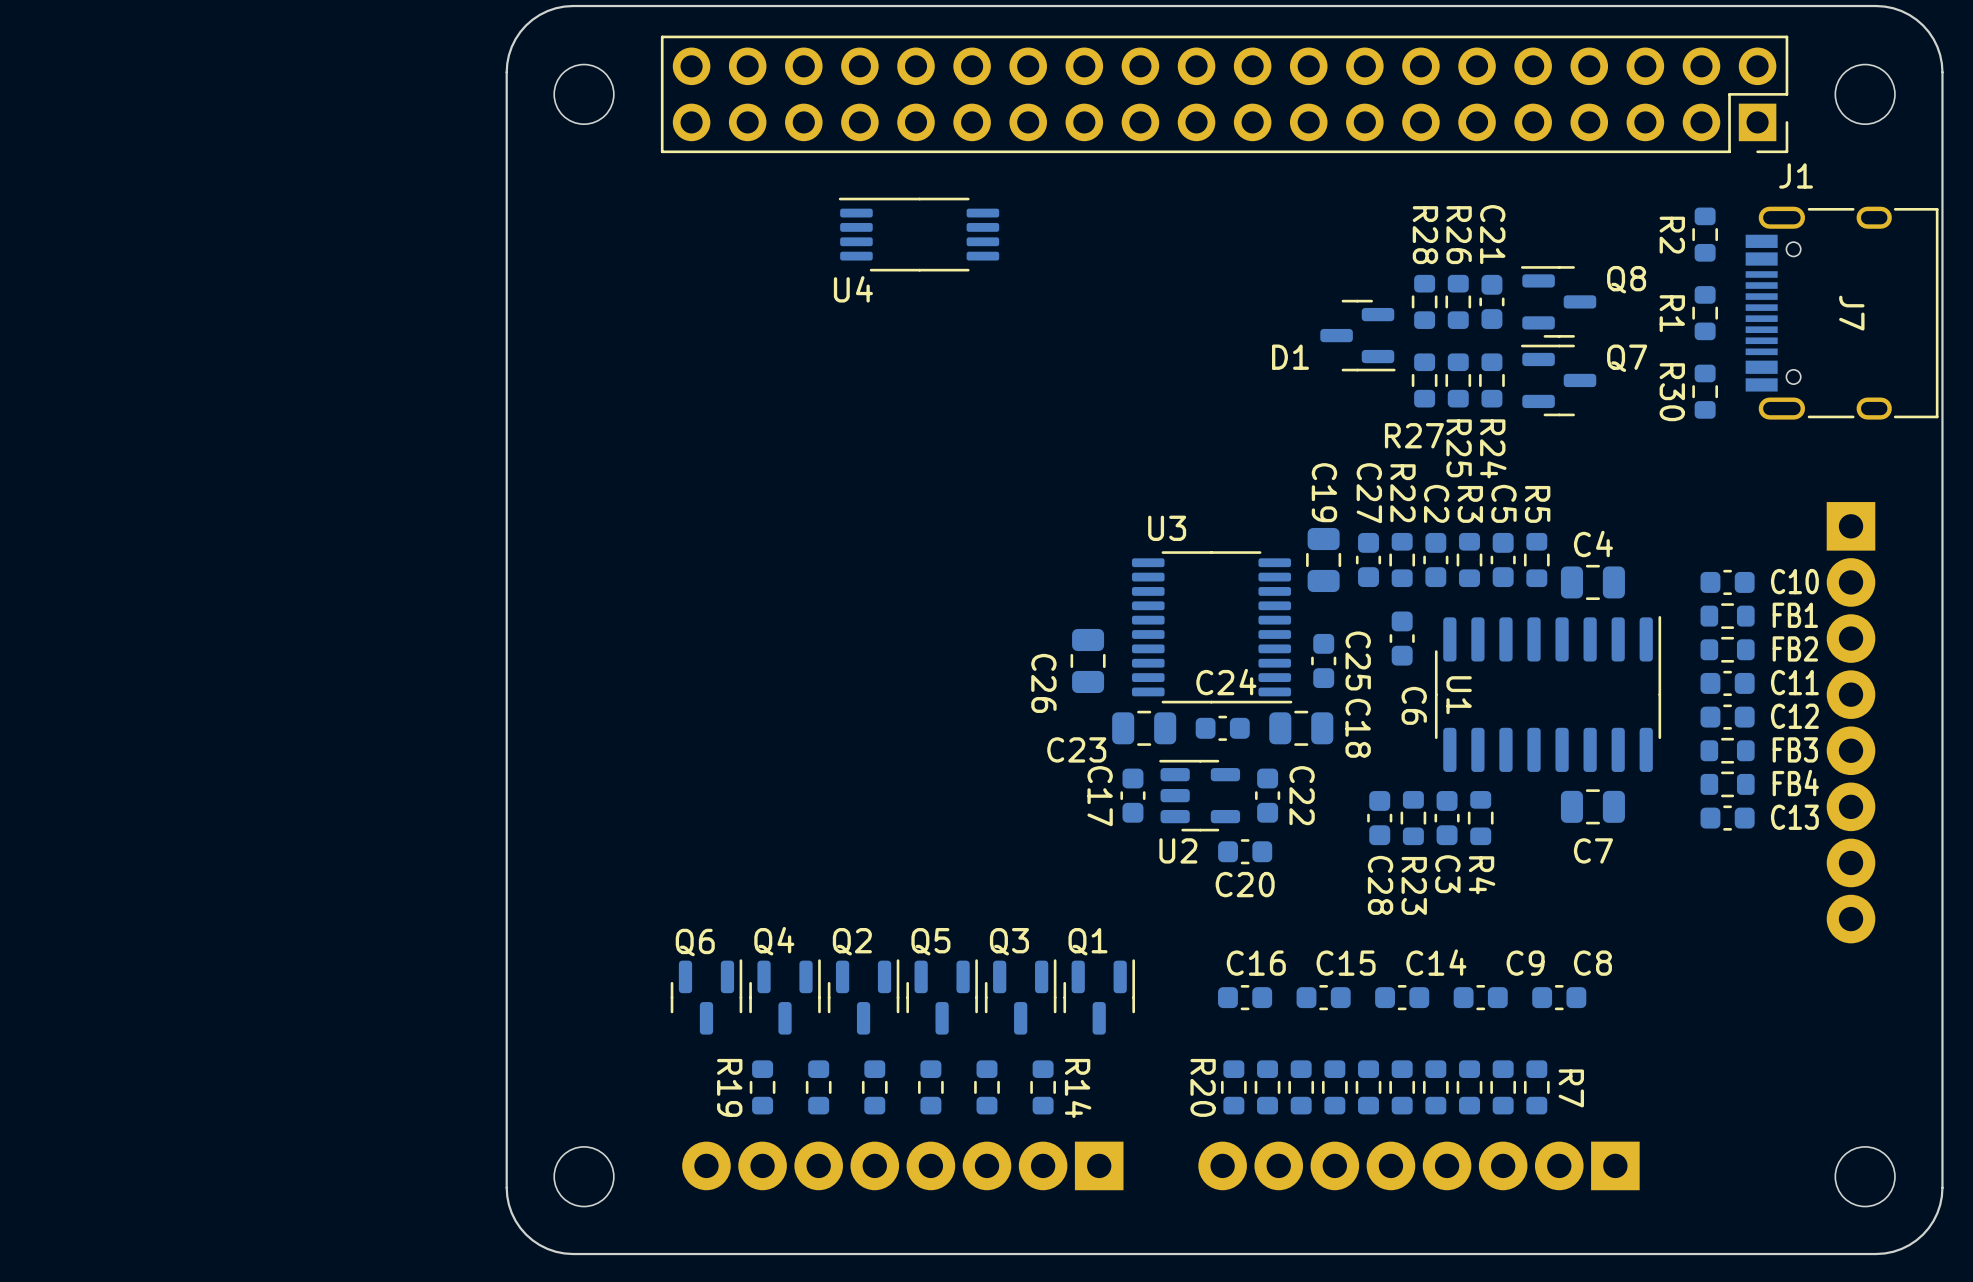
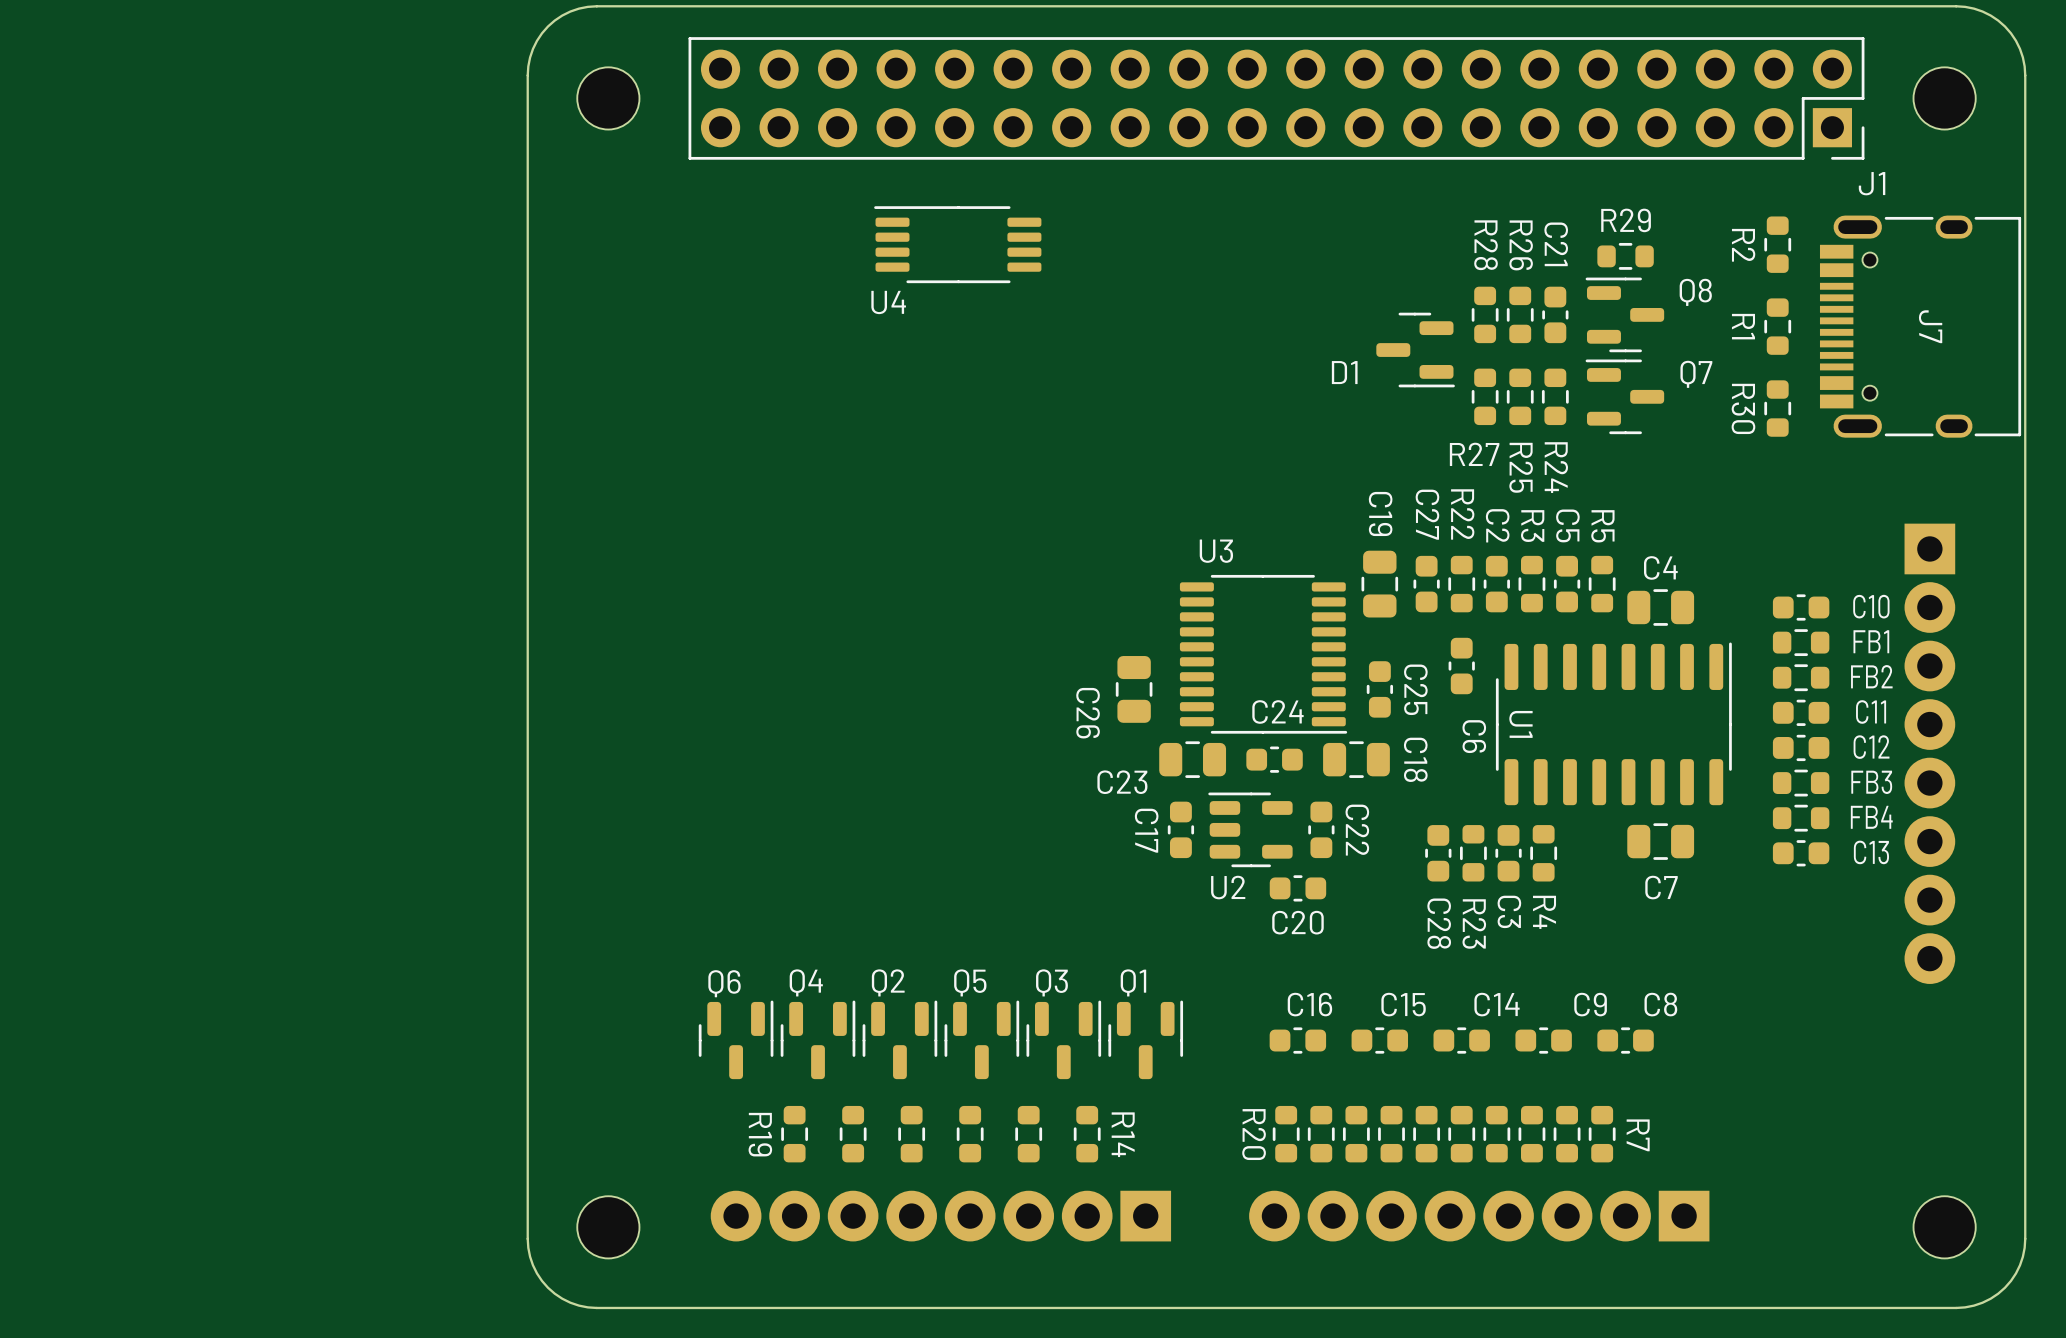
R29: none -> (1625, 256)

